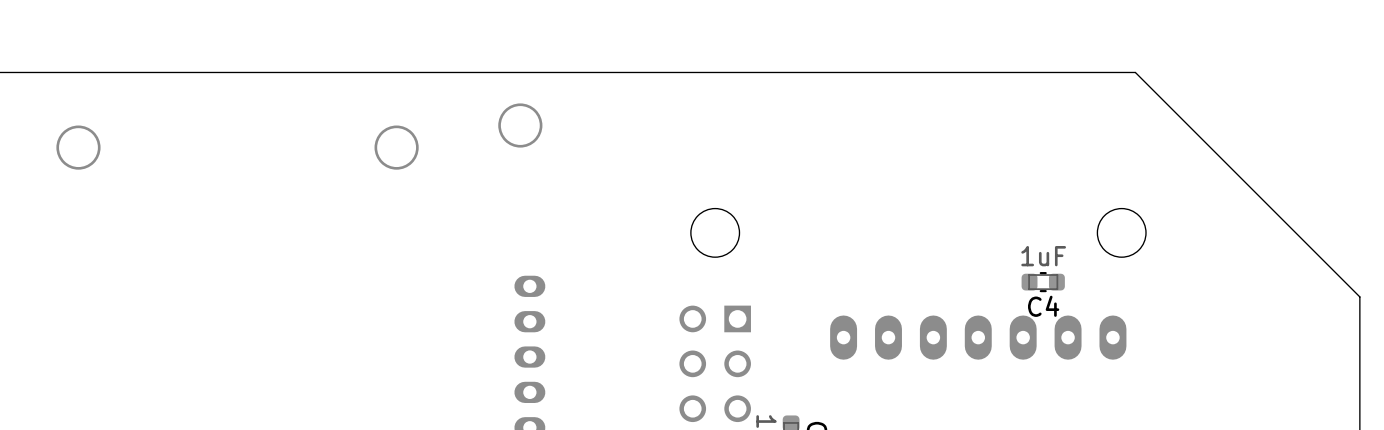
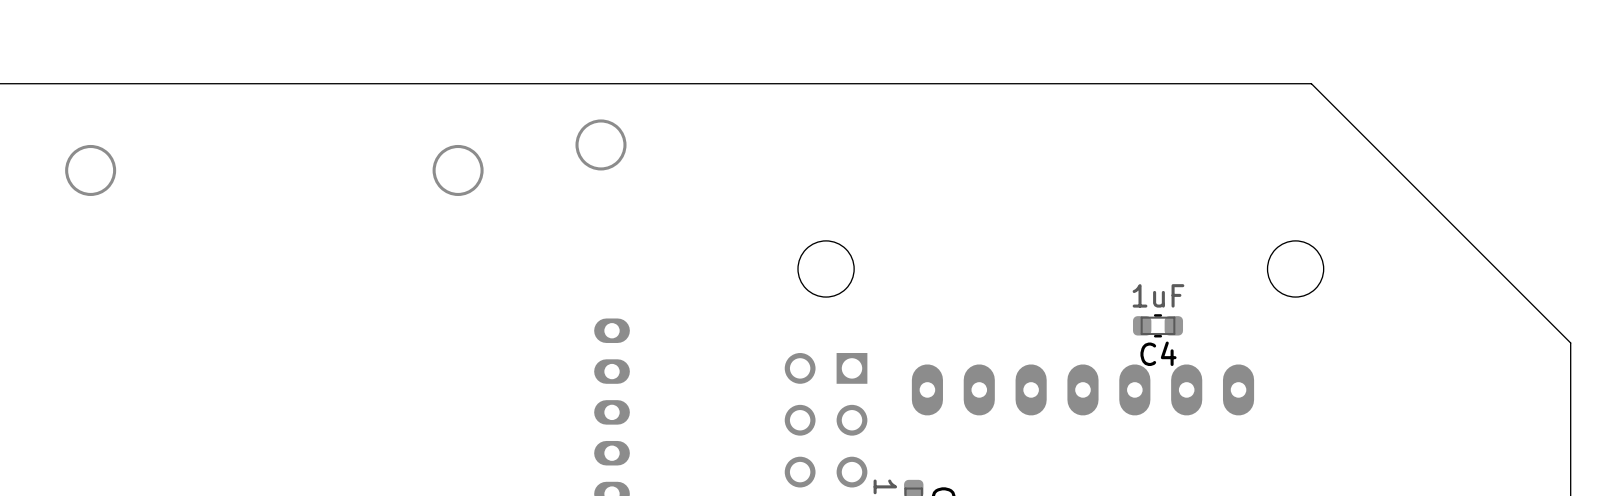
C4 position: (1043, 282) -> (1158, 325)
part position: (978, 337) -> (1082, 389)

